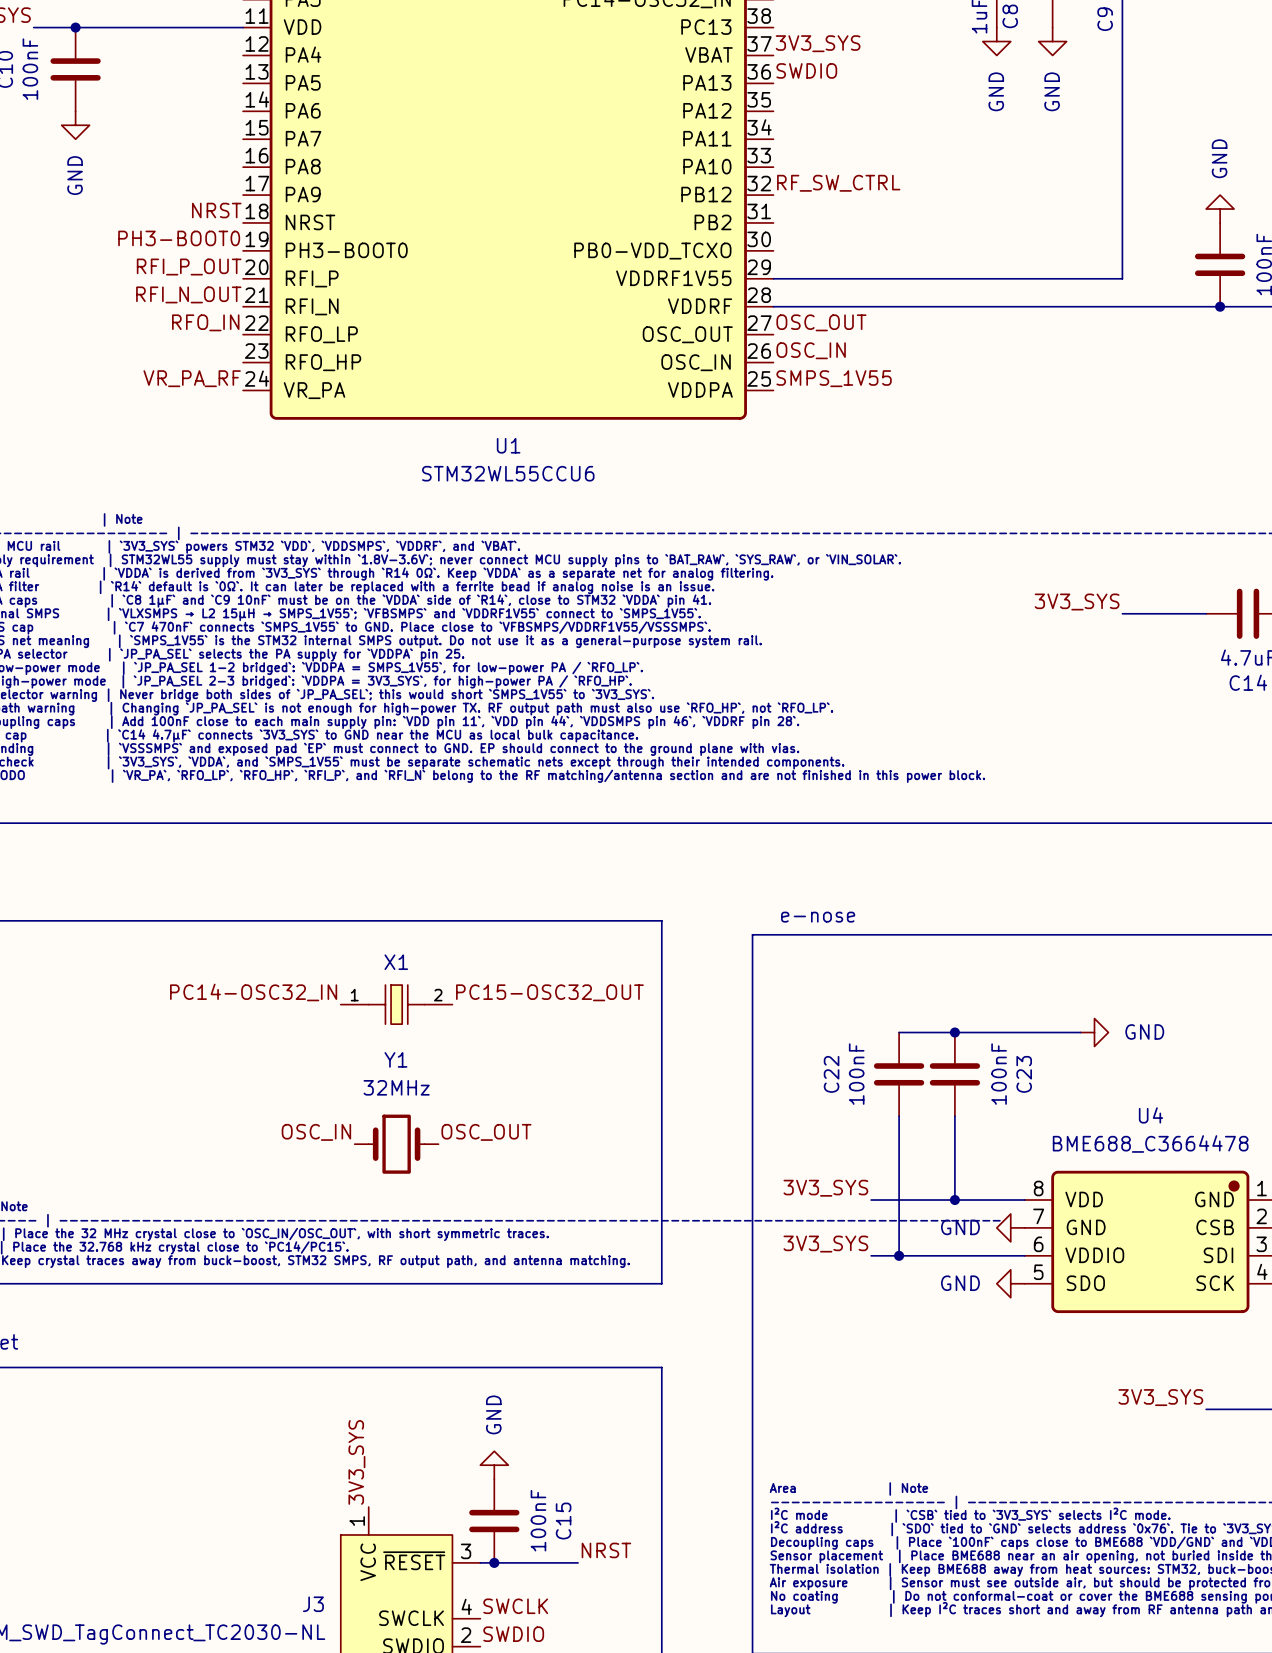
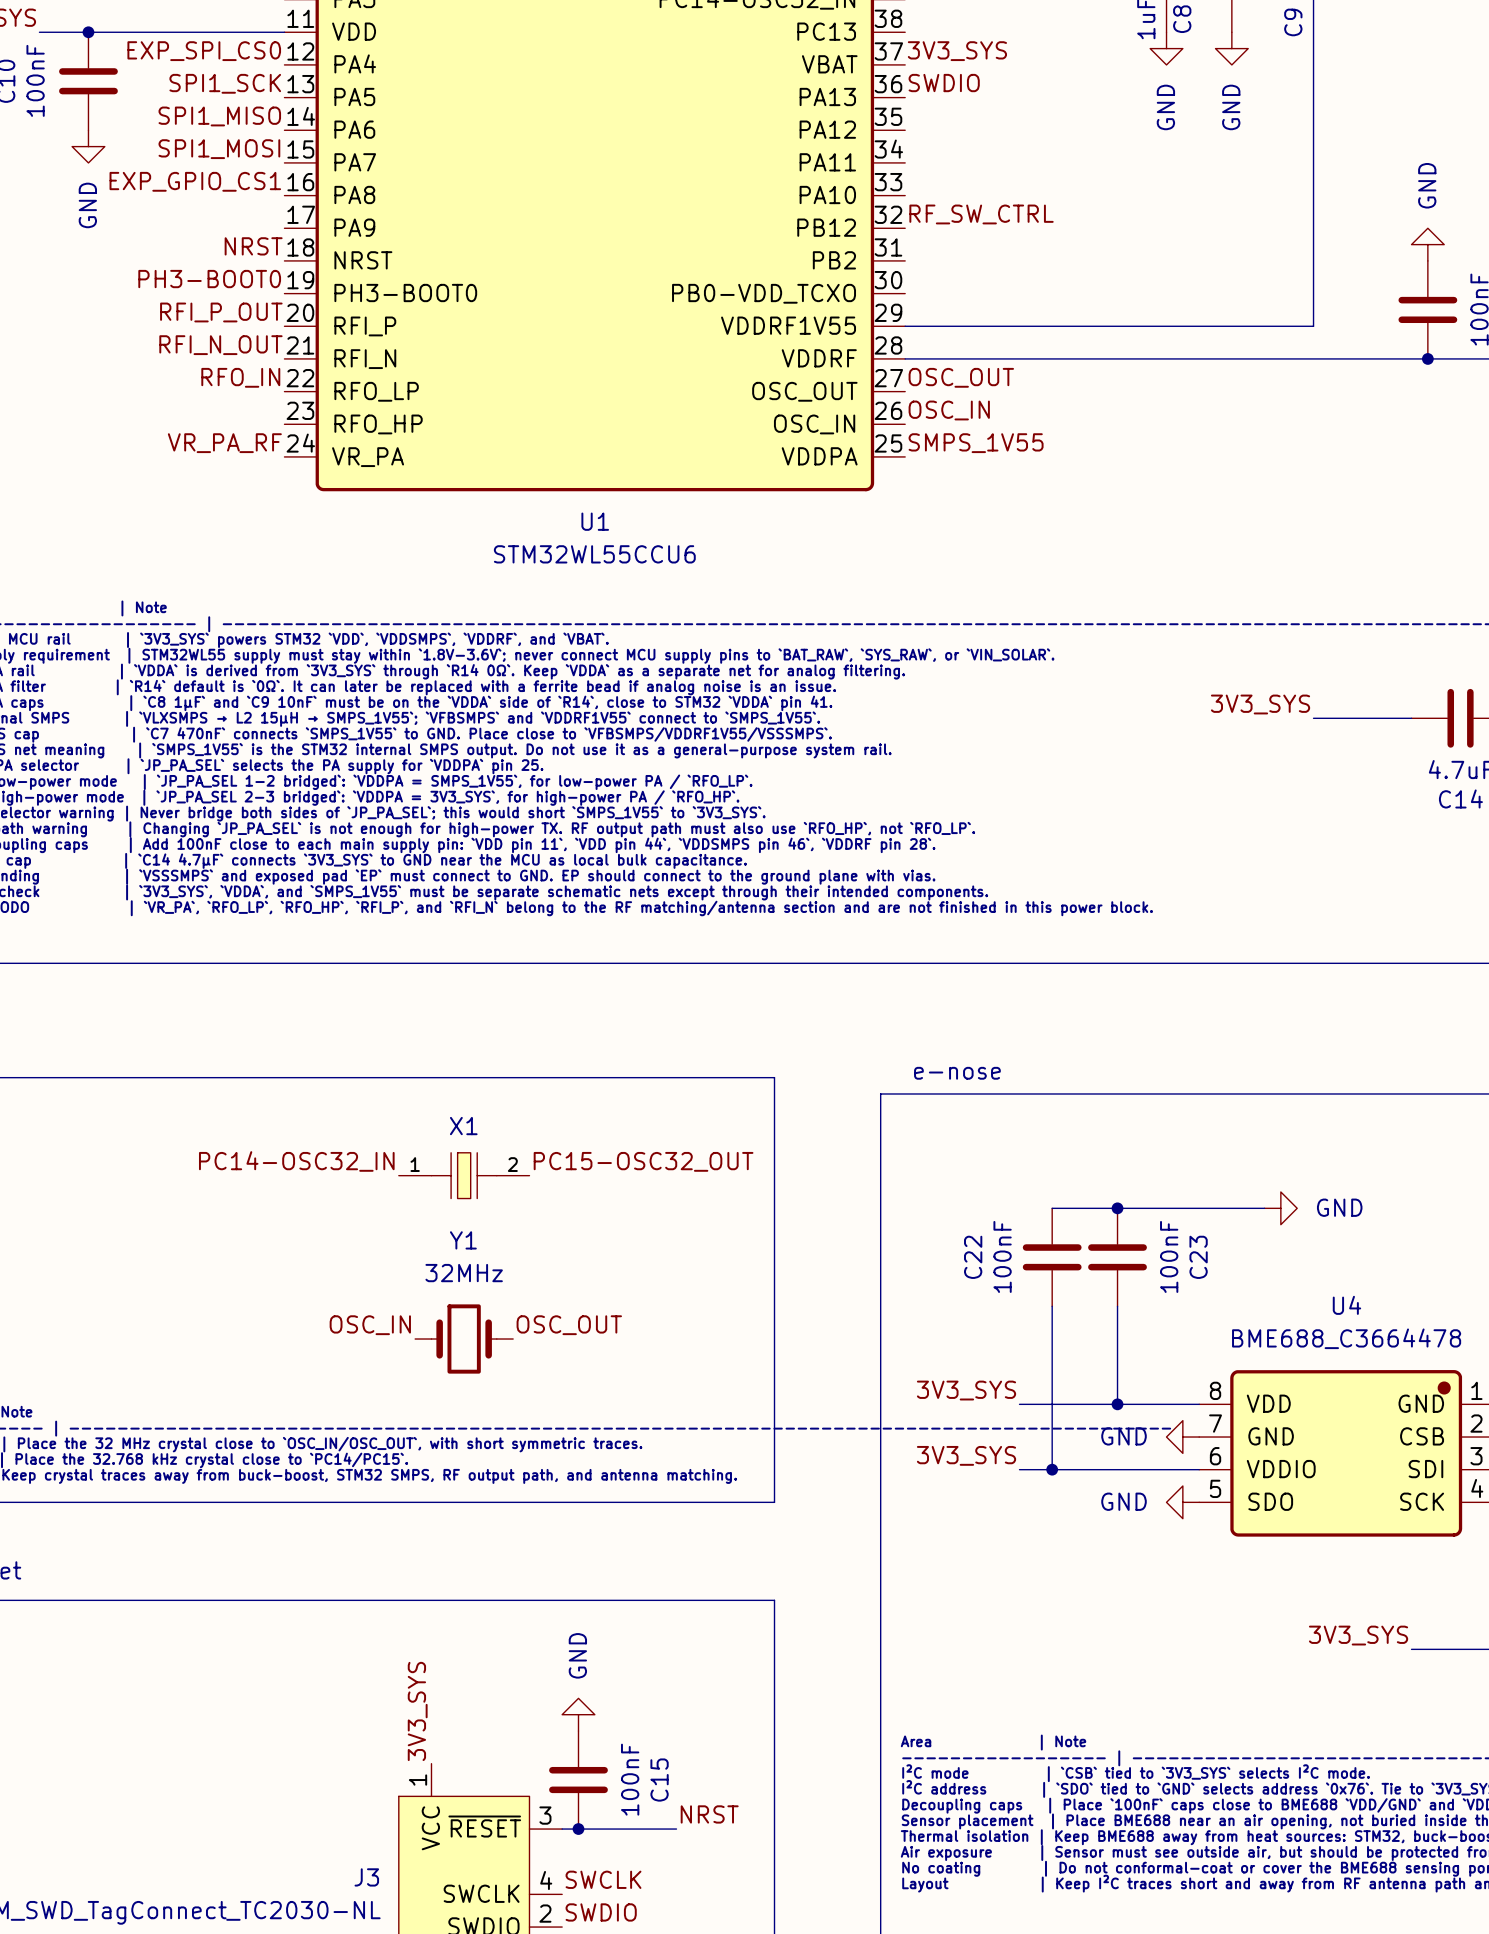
label: none -> EXP_SPI_CS0 (204, 51)
label: none -> SPI1_SCK (225, 83)
label: none -> SPI1_MISO (219, 116)
label: none -> SPI1_MOSI (219, 149)
label: none -> EXP_GPIO_CS1 (195, 181)

